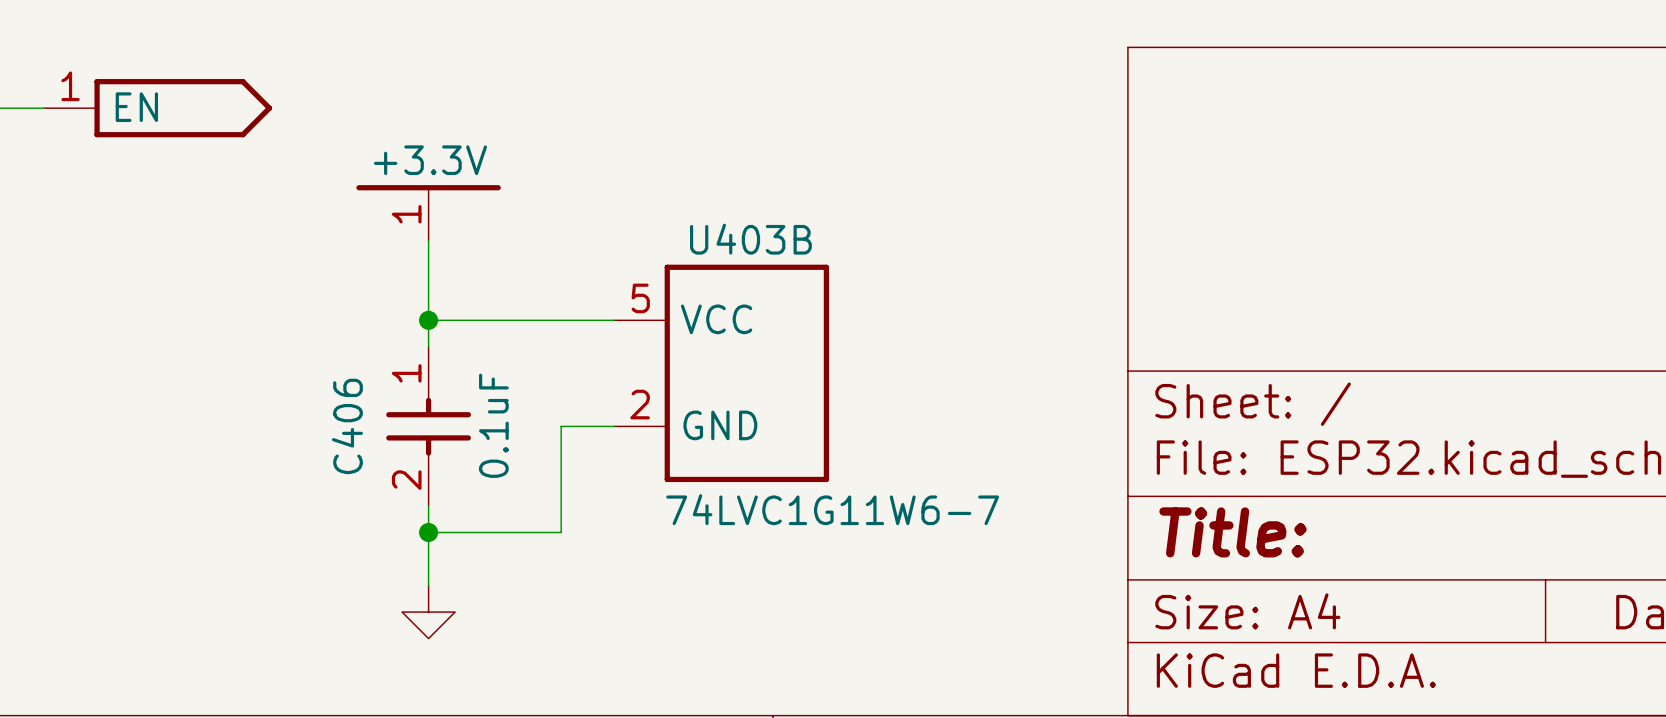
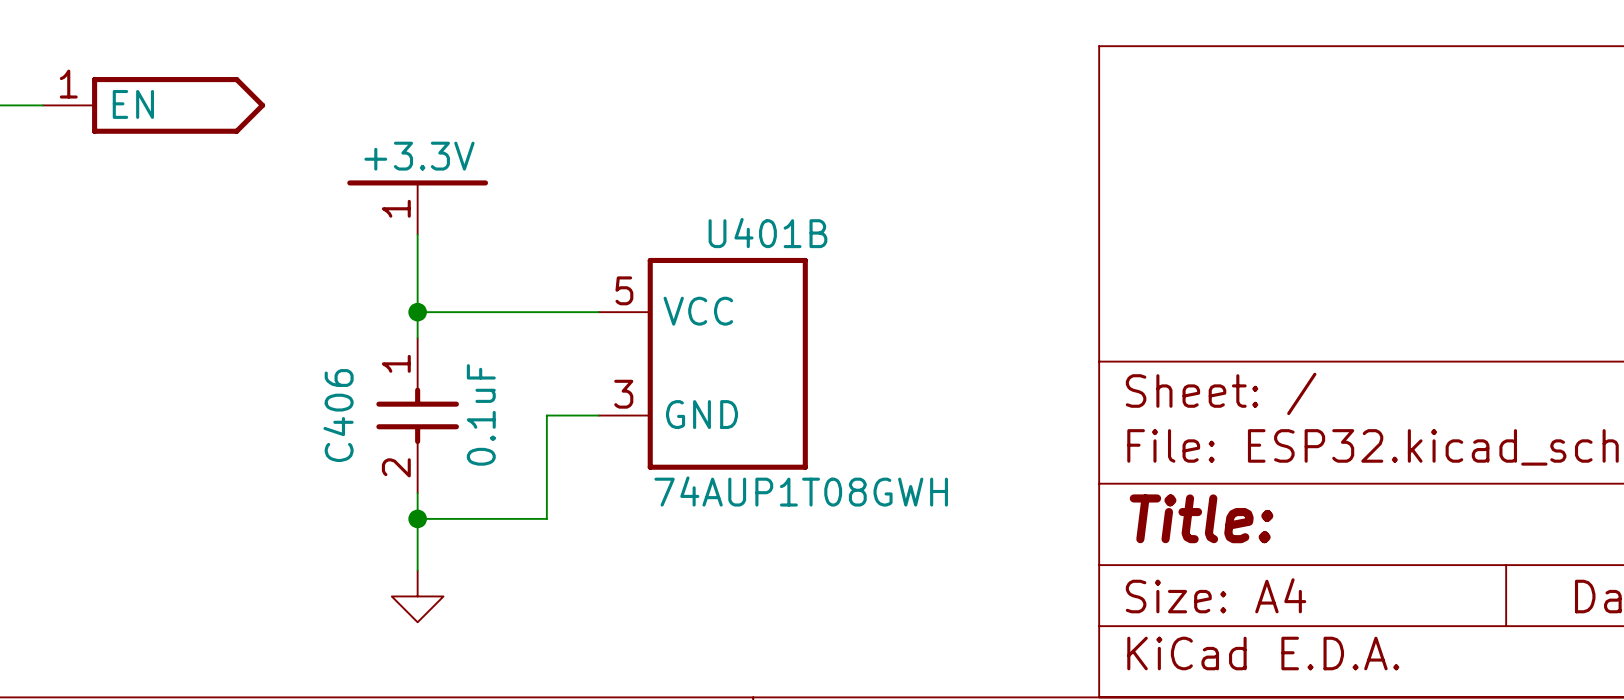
U403B name: U403B (750, 239) -> U401B (767, 233)
U403B pin number: 2 (640, 404) -> 3 (623, 394)
U403B text: 74LVC1G11W6-7 (832, 509) -> 74AUP1T08GWH (801, 491)

